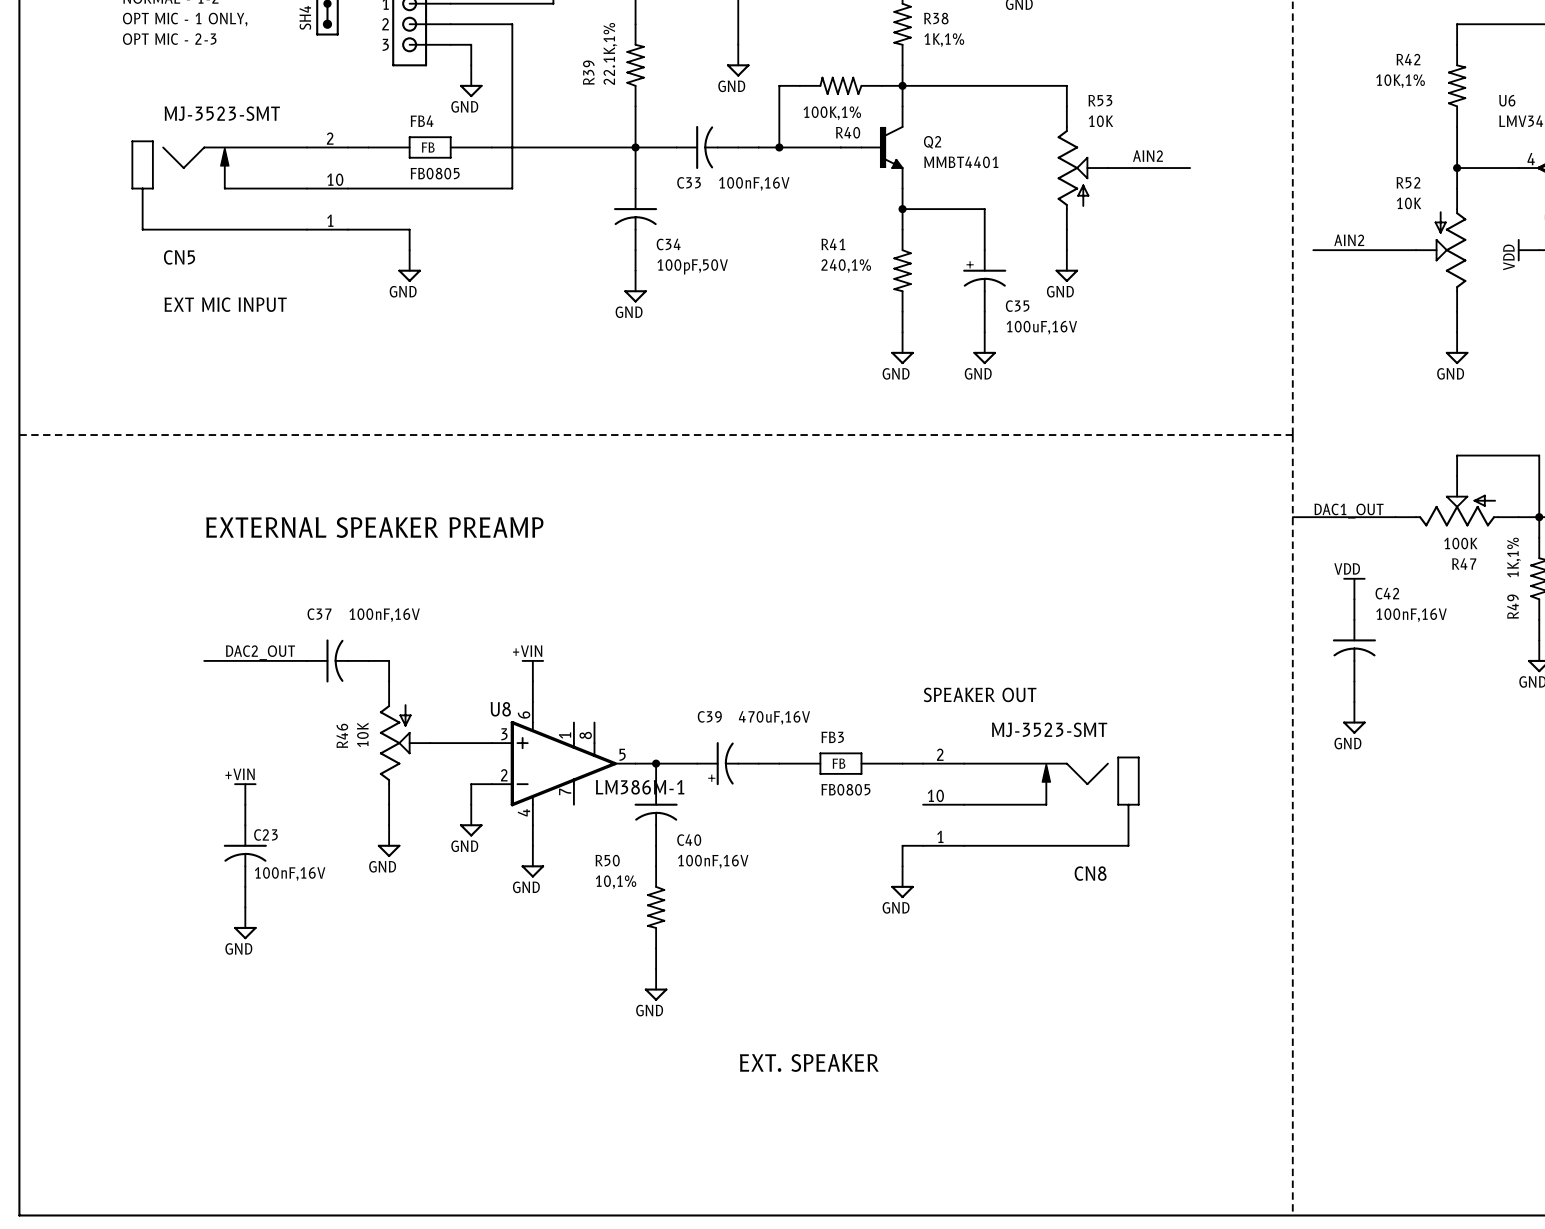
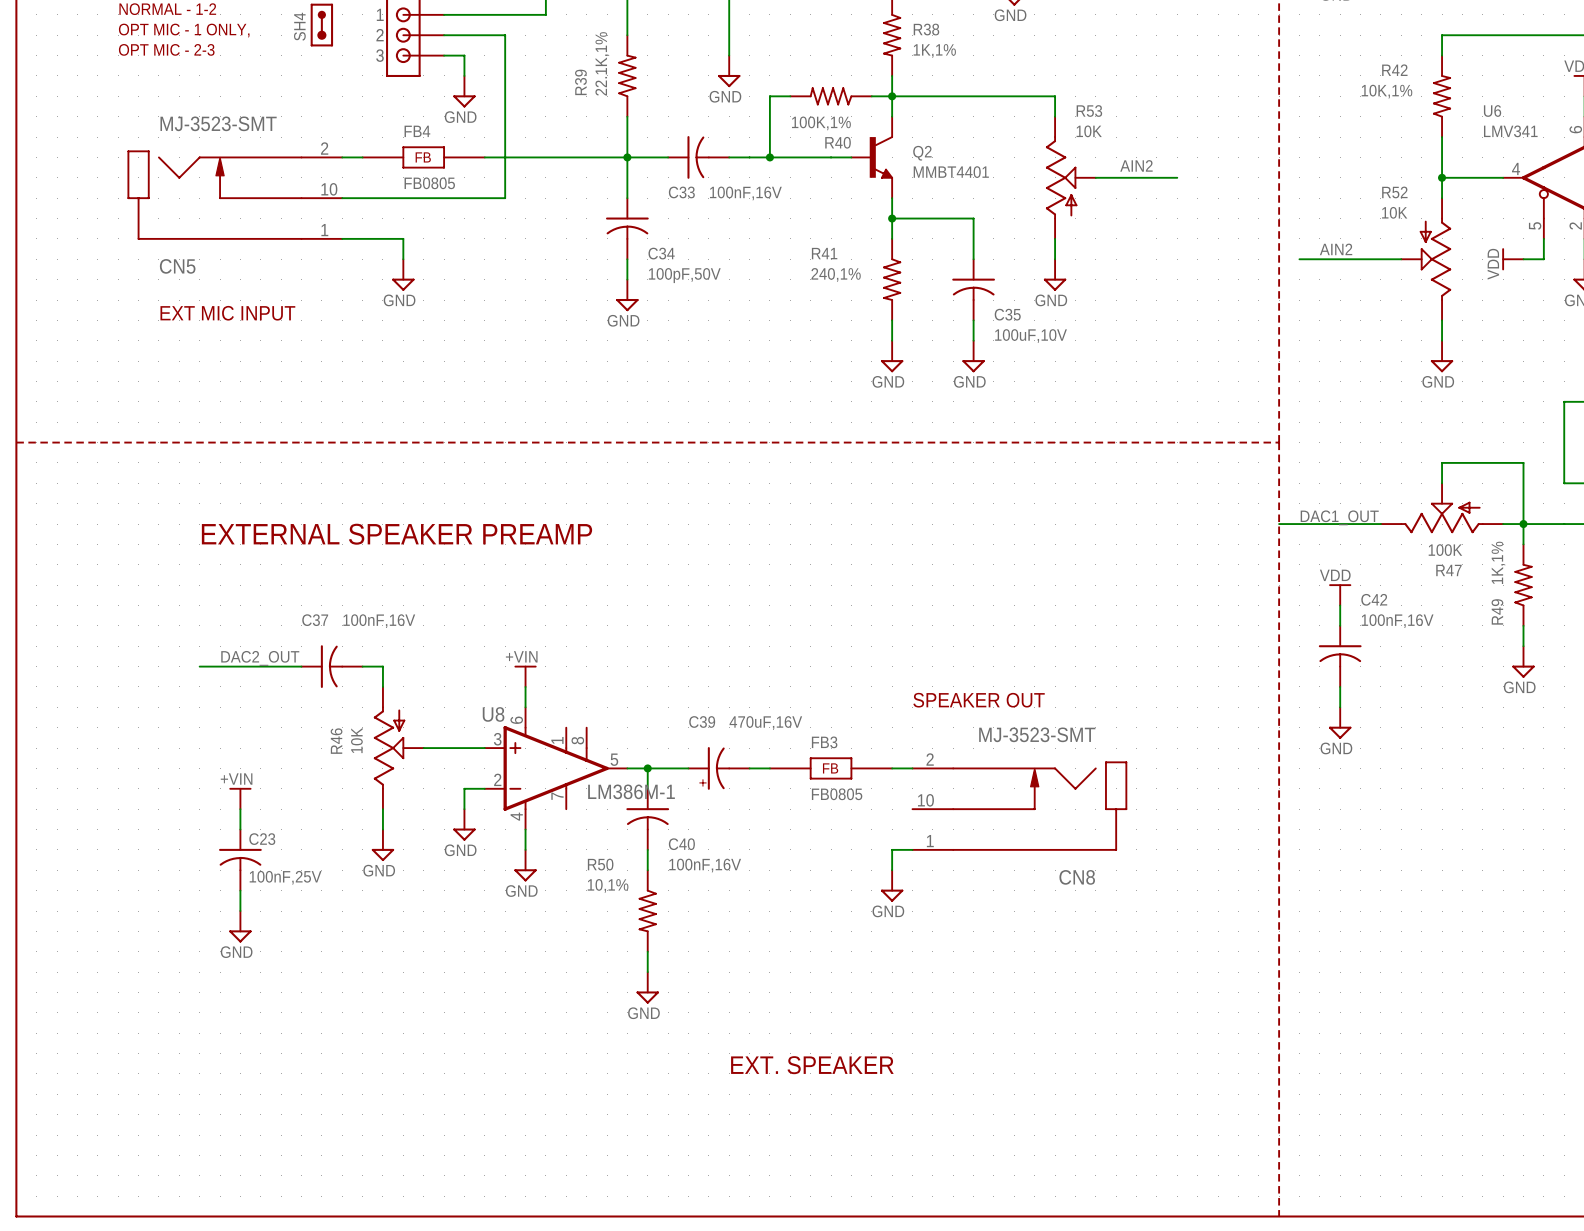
C35 symbol: [963, 250, 1007, 312] -> [952, 259, 995, 321]
C35 value: 100uF,16V (1041, 327) -> 100uF,10V (1031, 336)
C23 value: 100nF,16V (290, 874) -> 100nF,25V (285, 877)

